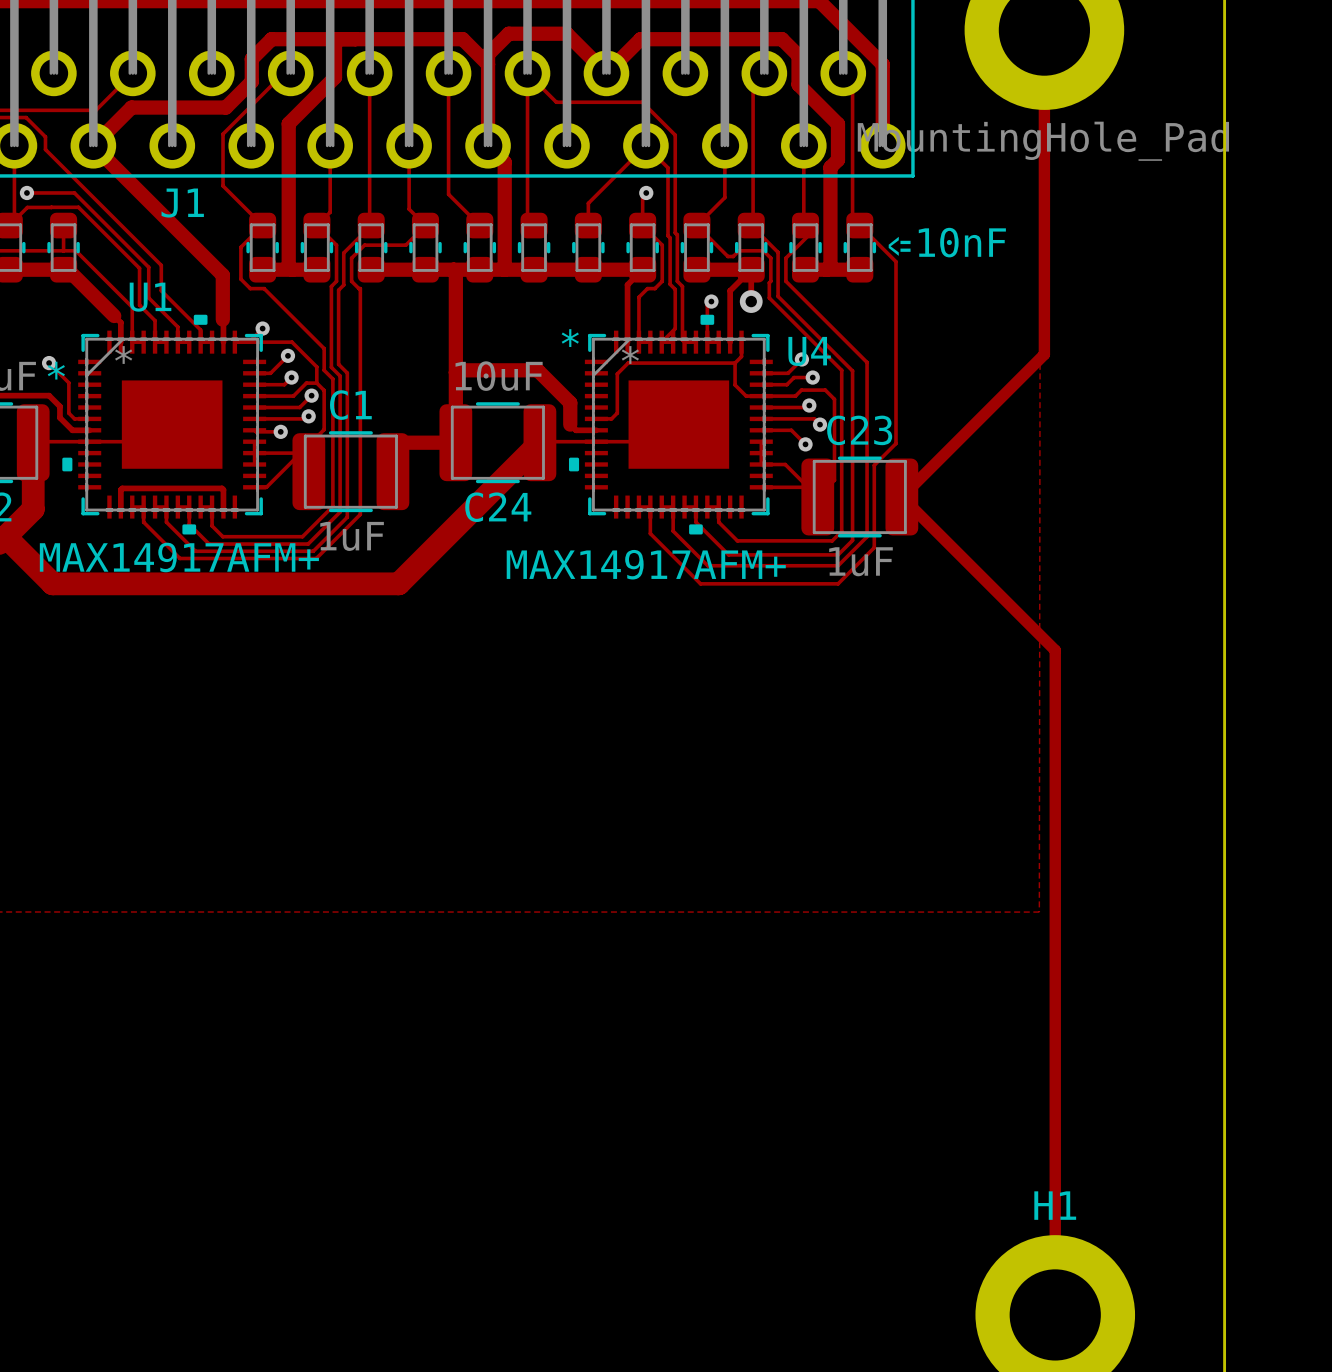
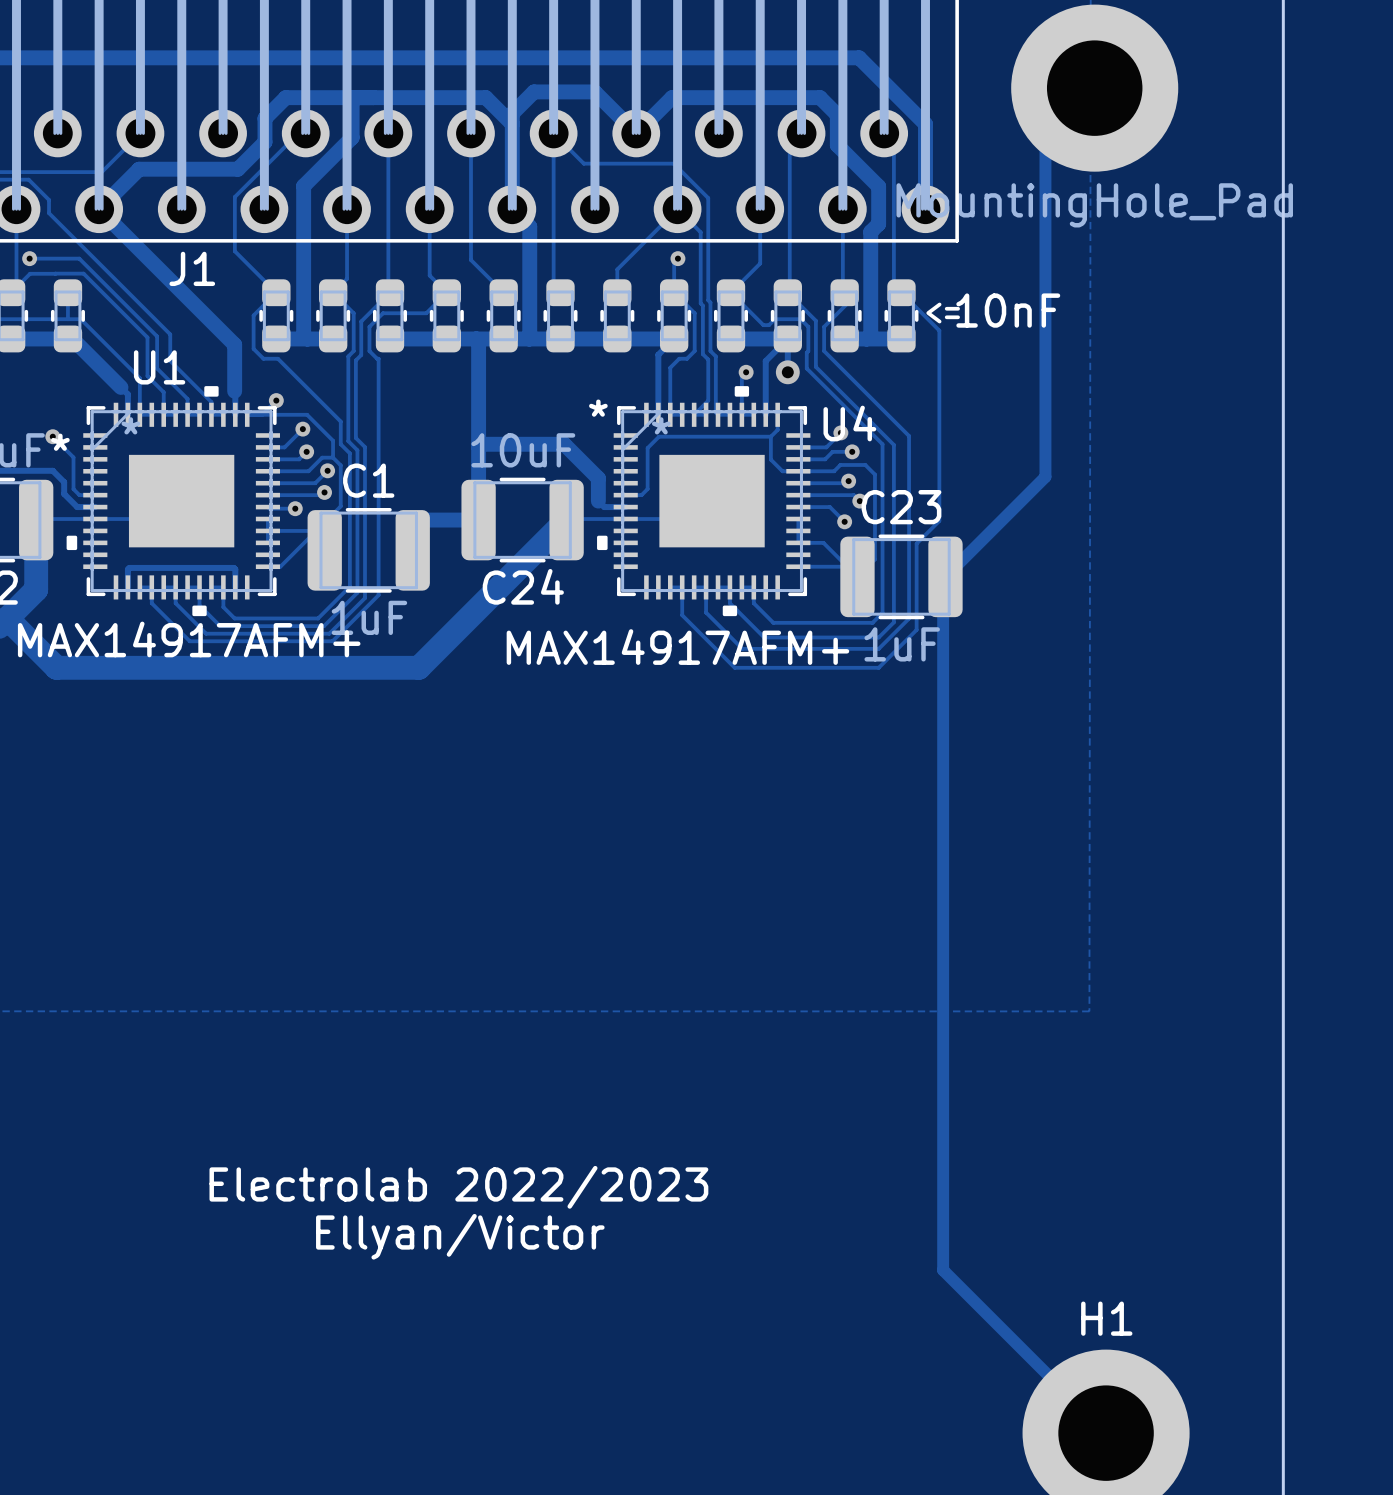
track: (1044, 30) (1044, 354) (997, 401) -> (1094, 88) (1045, 137) (1045, 476)
track: (901, 496) (1055, 650) (1055, 1314) -> (945, 576) (943, 579) (943, 1270) (1106, 1433)
text: none -> Electrolab 2022/2023 (458, 1187)
text: none -> Ellyan/Victor (460, 1236)

